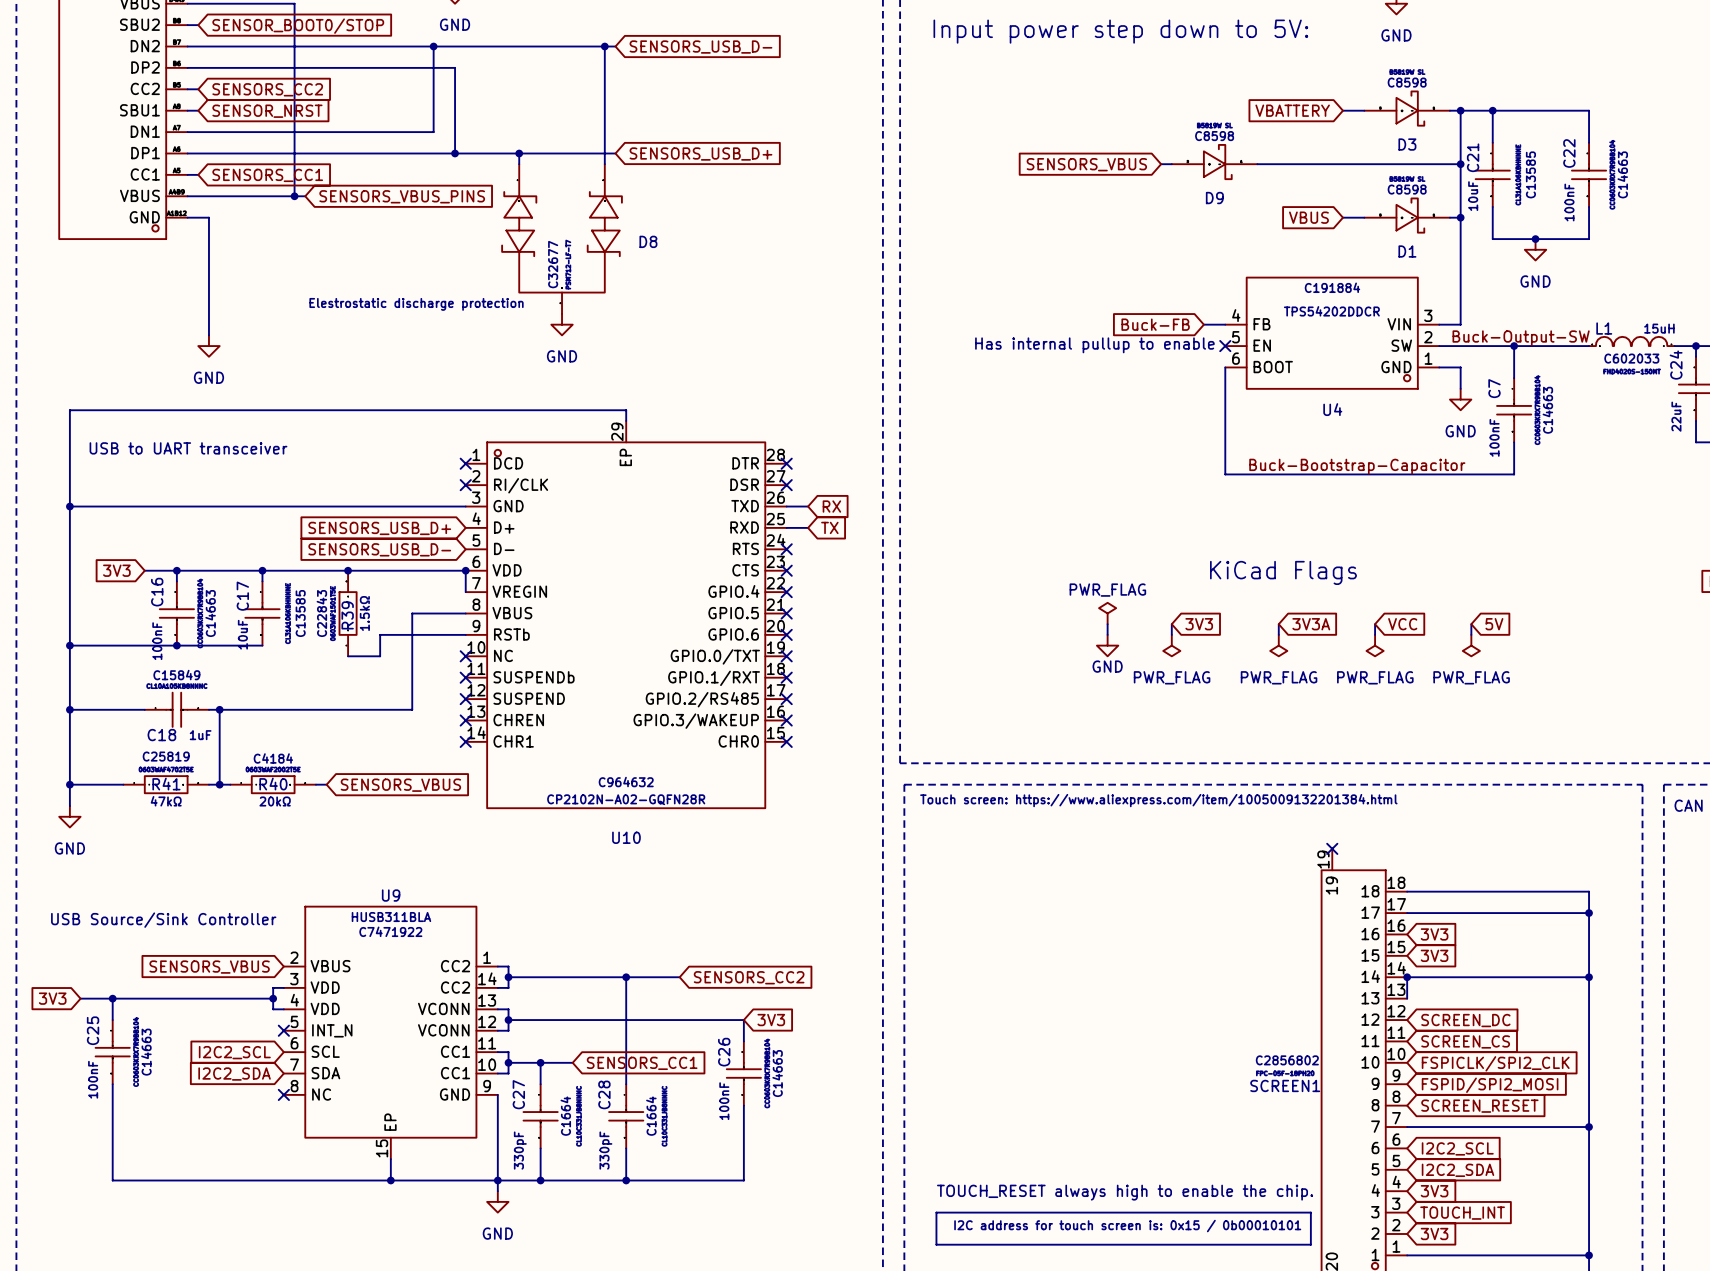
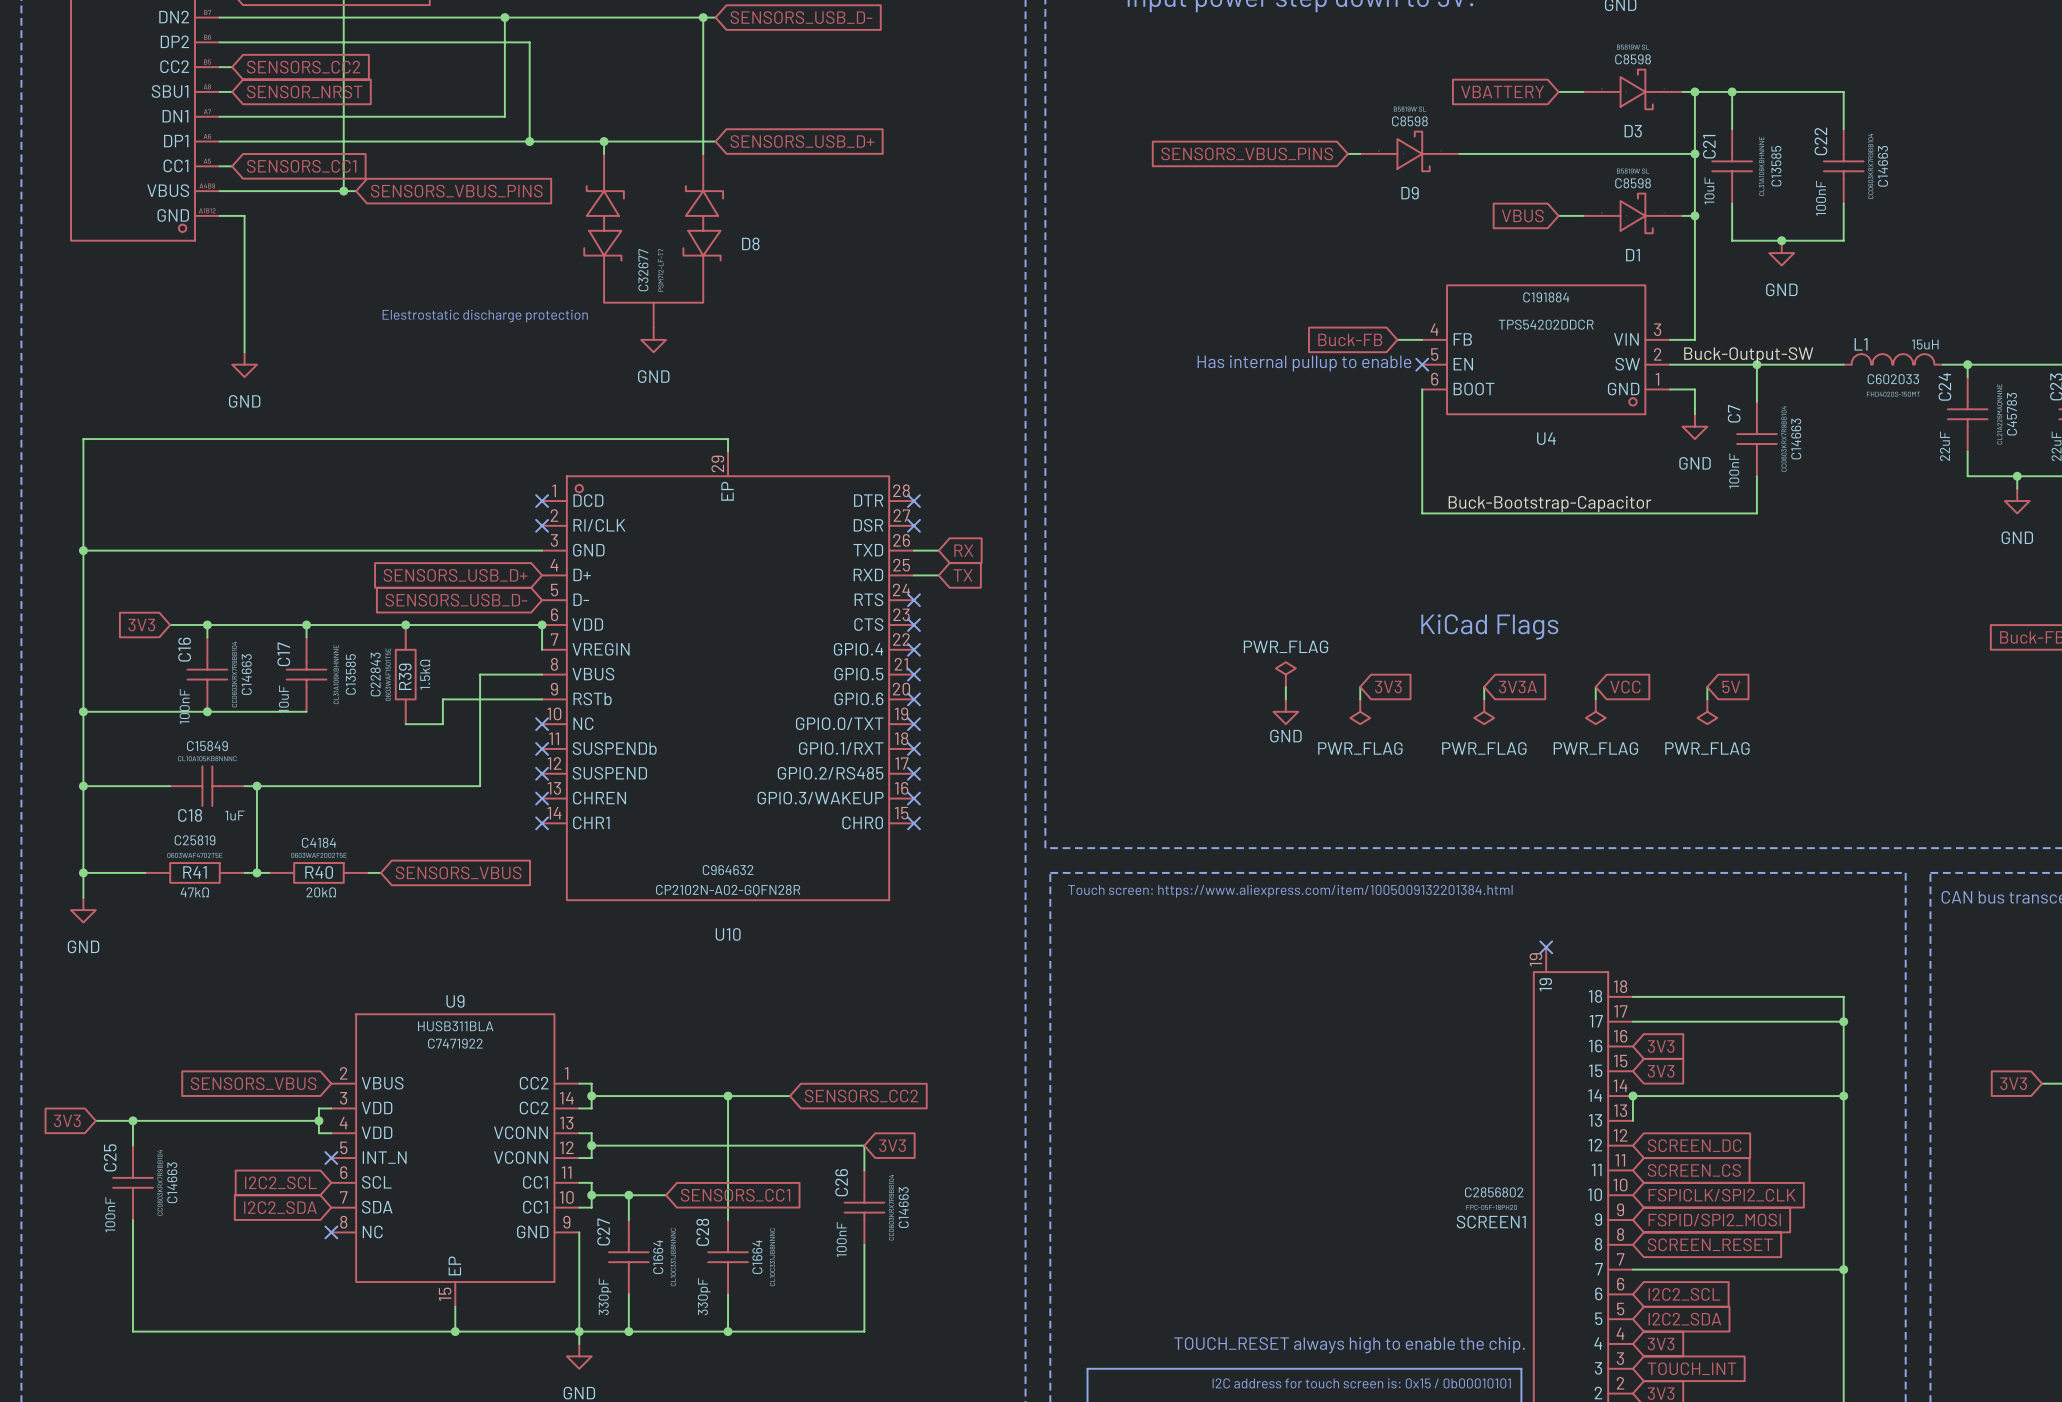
global label: SENSORS_VBUS (1086, 164) -> SENSORS_VBUS_PINS (1247, 153)
text: USB to UART transceiver (188, 448) -> none
text: USB Source/Sink Controller (163, 920) -> none

